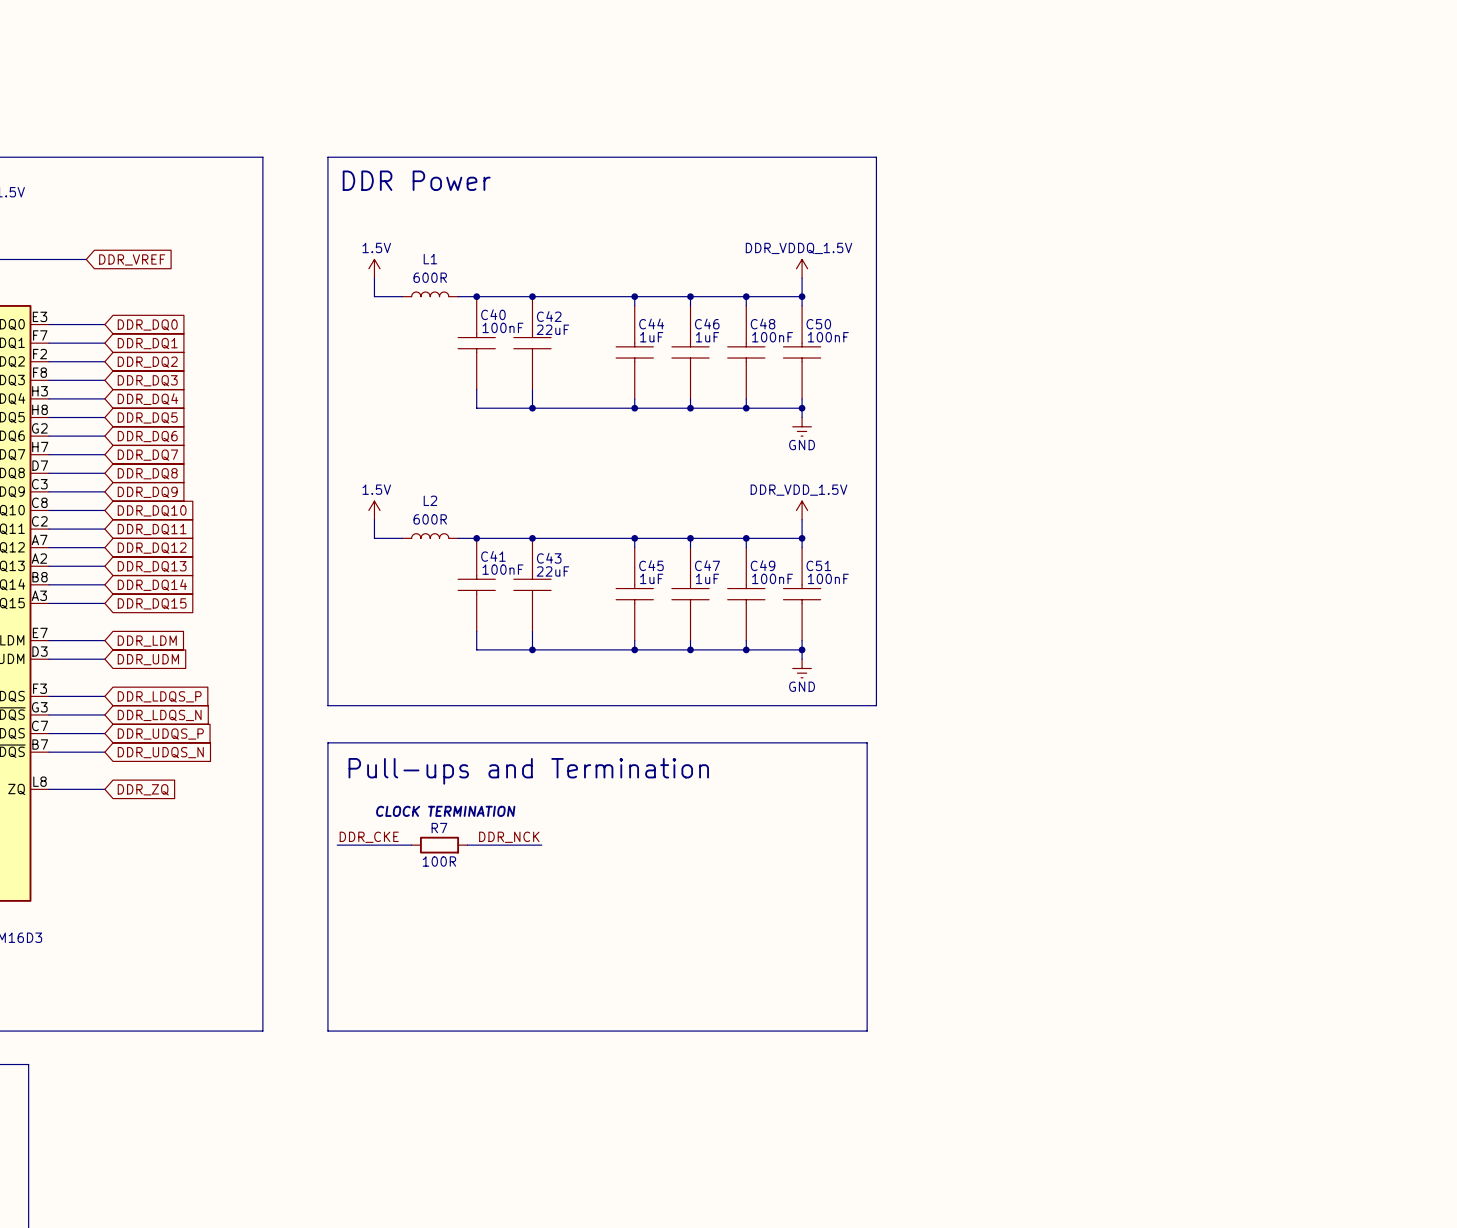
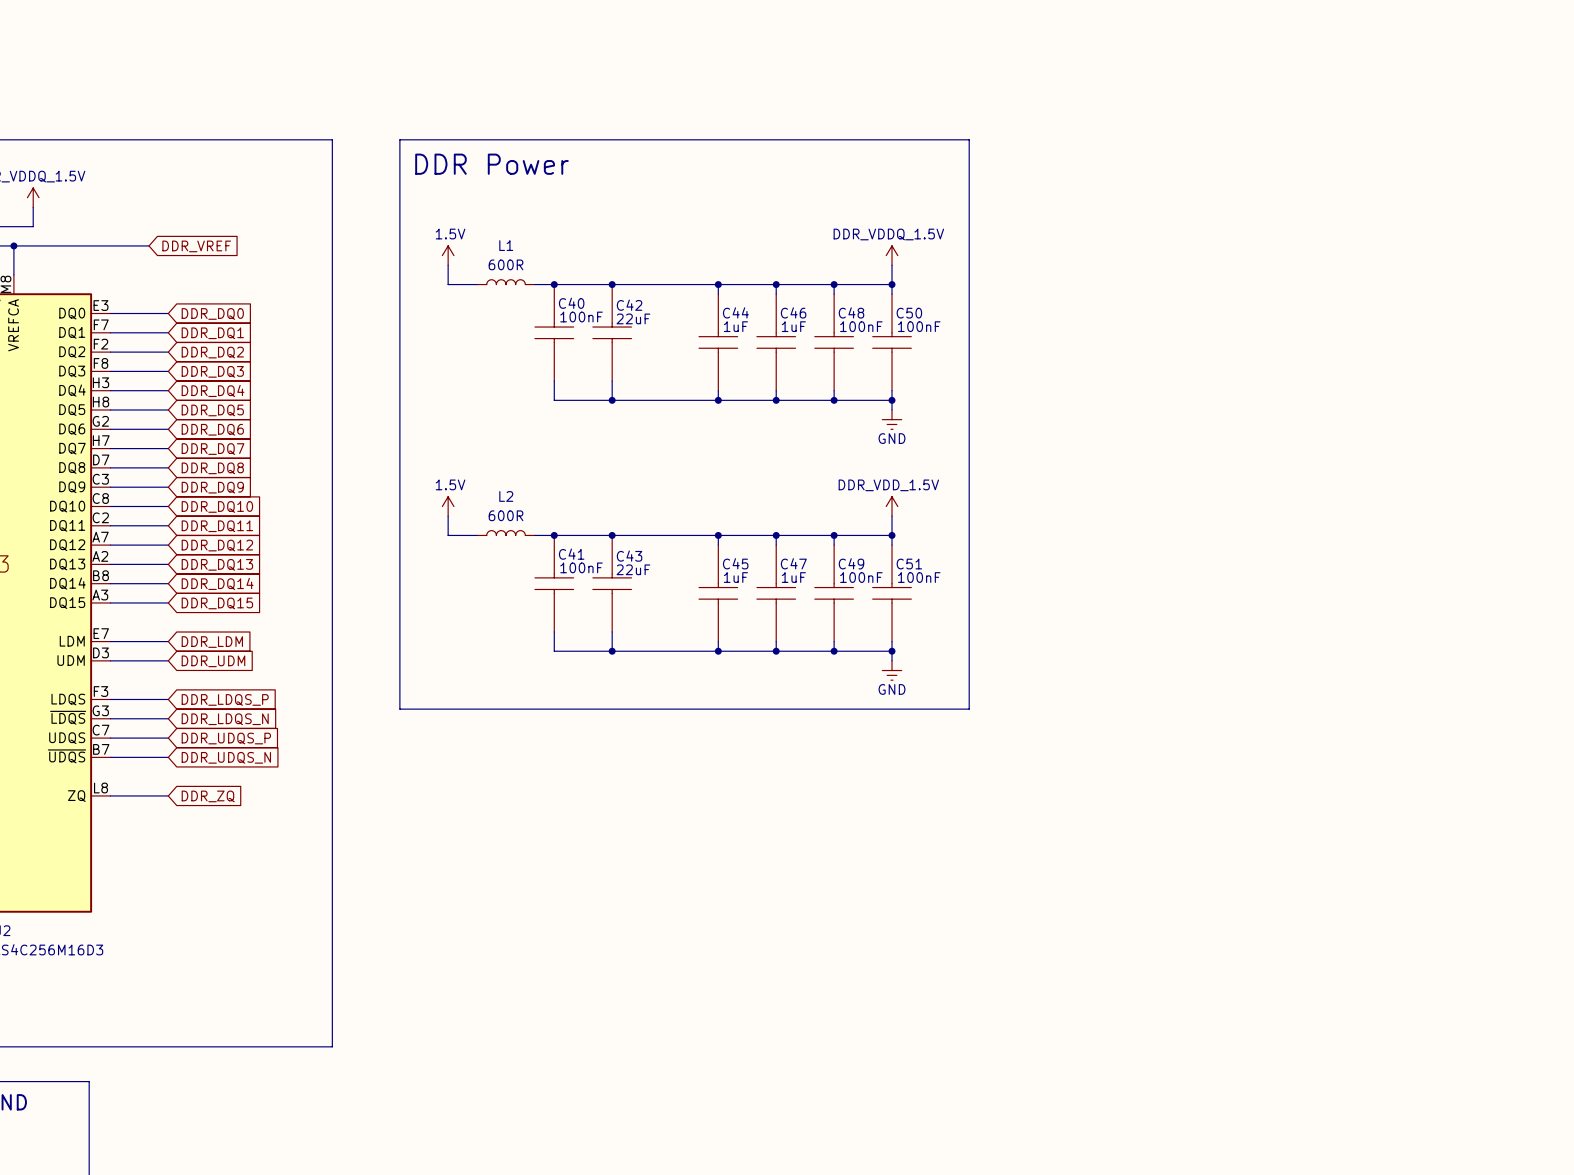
line: (327, 742) (867, 742) (867, 1031) (327, 1031) (327, 742) -> none
text: Pull-ups and Termination (528, 771) -> none
text: CLOCK TERMINATION (445, 811) -> none
label: DDR_CKE (369, 837) -> none
label: DDR_NCK (509, 837) -> none
wire: (337, 845) (411, 845) -> none
R7: 100R (439, 845) -> none
wire: (467, 845) (541, 845) -> none

